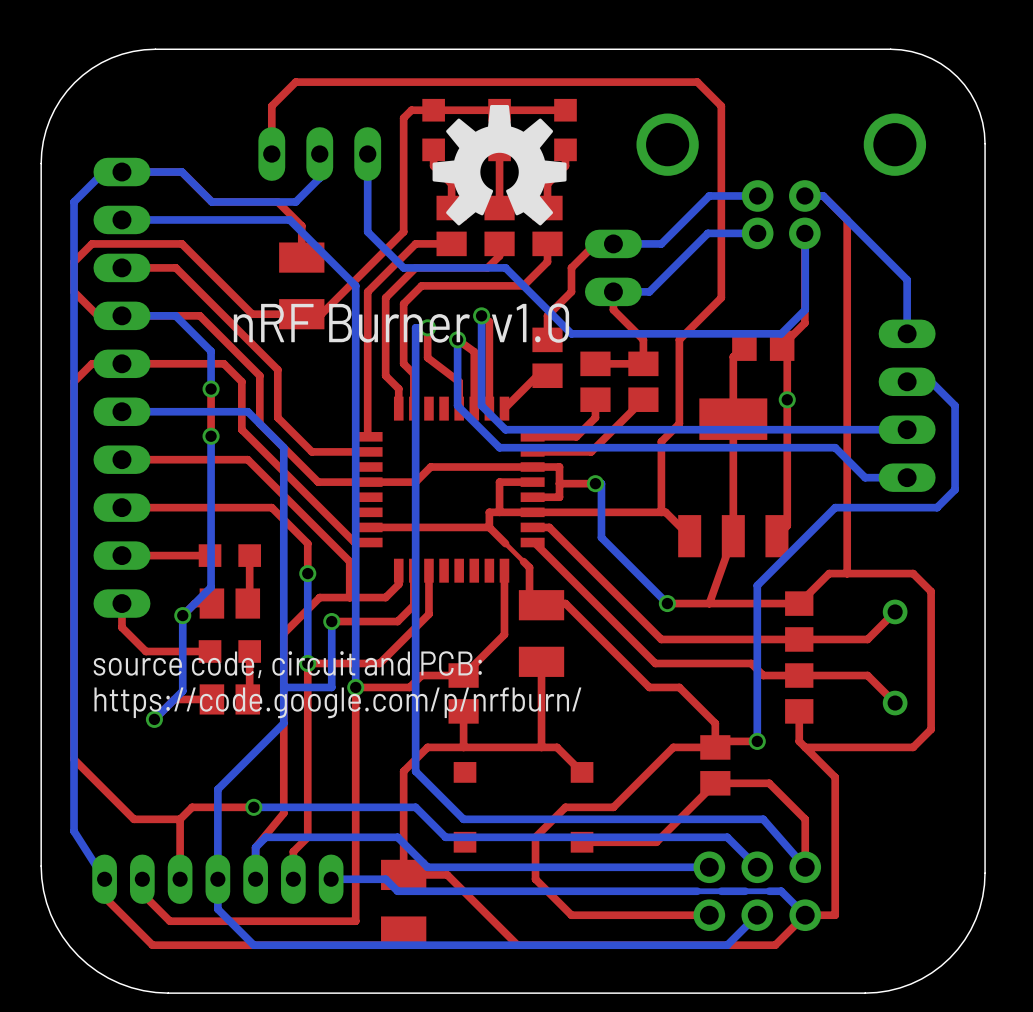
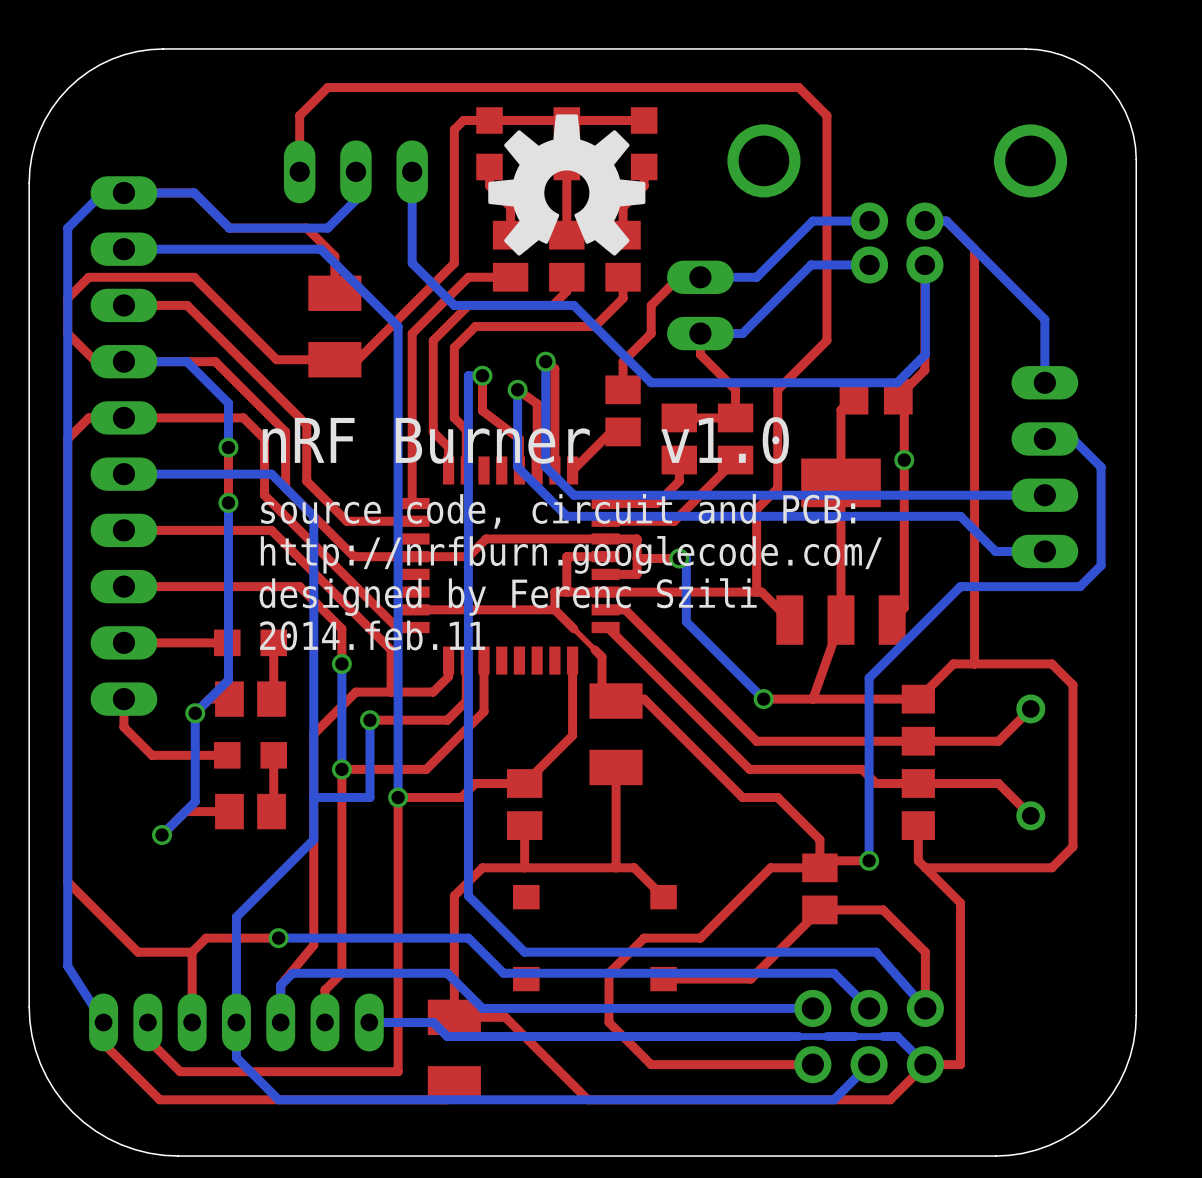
text position: nRF Burner v1.0 (401, 323) -> nRF Burner v1.0 (525, 440)
text: none -> http://nrfburn.googlecode.com/ (571, 554)
text: none -> designed by Ferenc Szili (508, 597)
text: none -> 2014.feb.11 (372, 635)
text position: source code, circuit and PCB: (287, 664) -> source code, circuit and PCB: (558, 511)
text: https://code.google.com/p/nrfburn/ (337, 702) -> none

